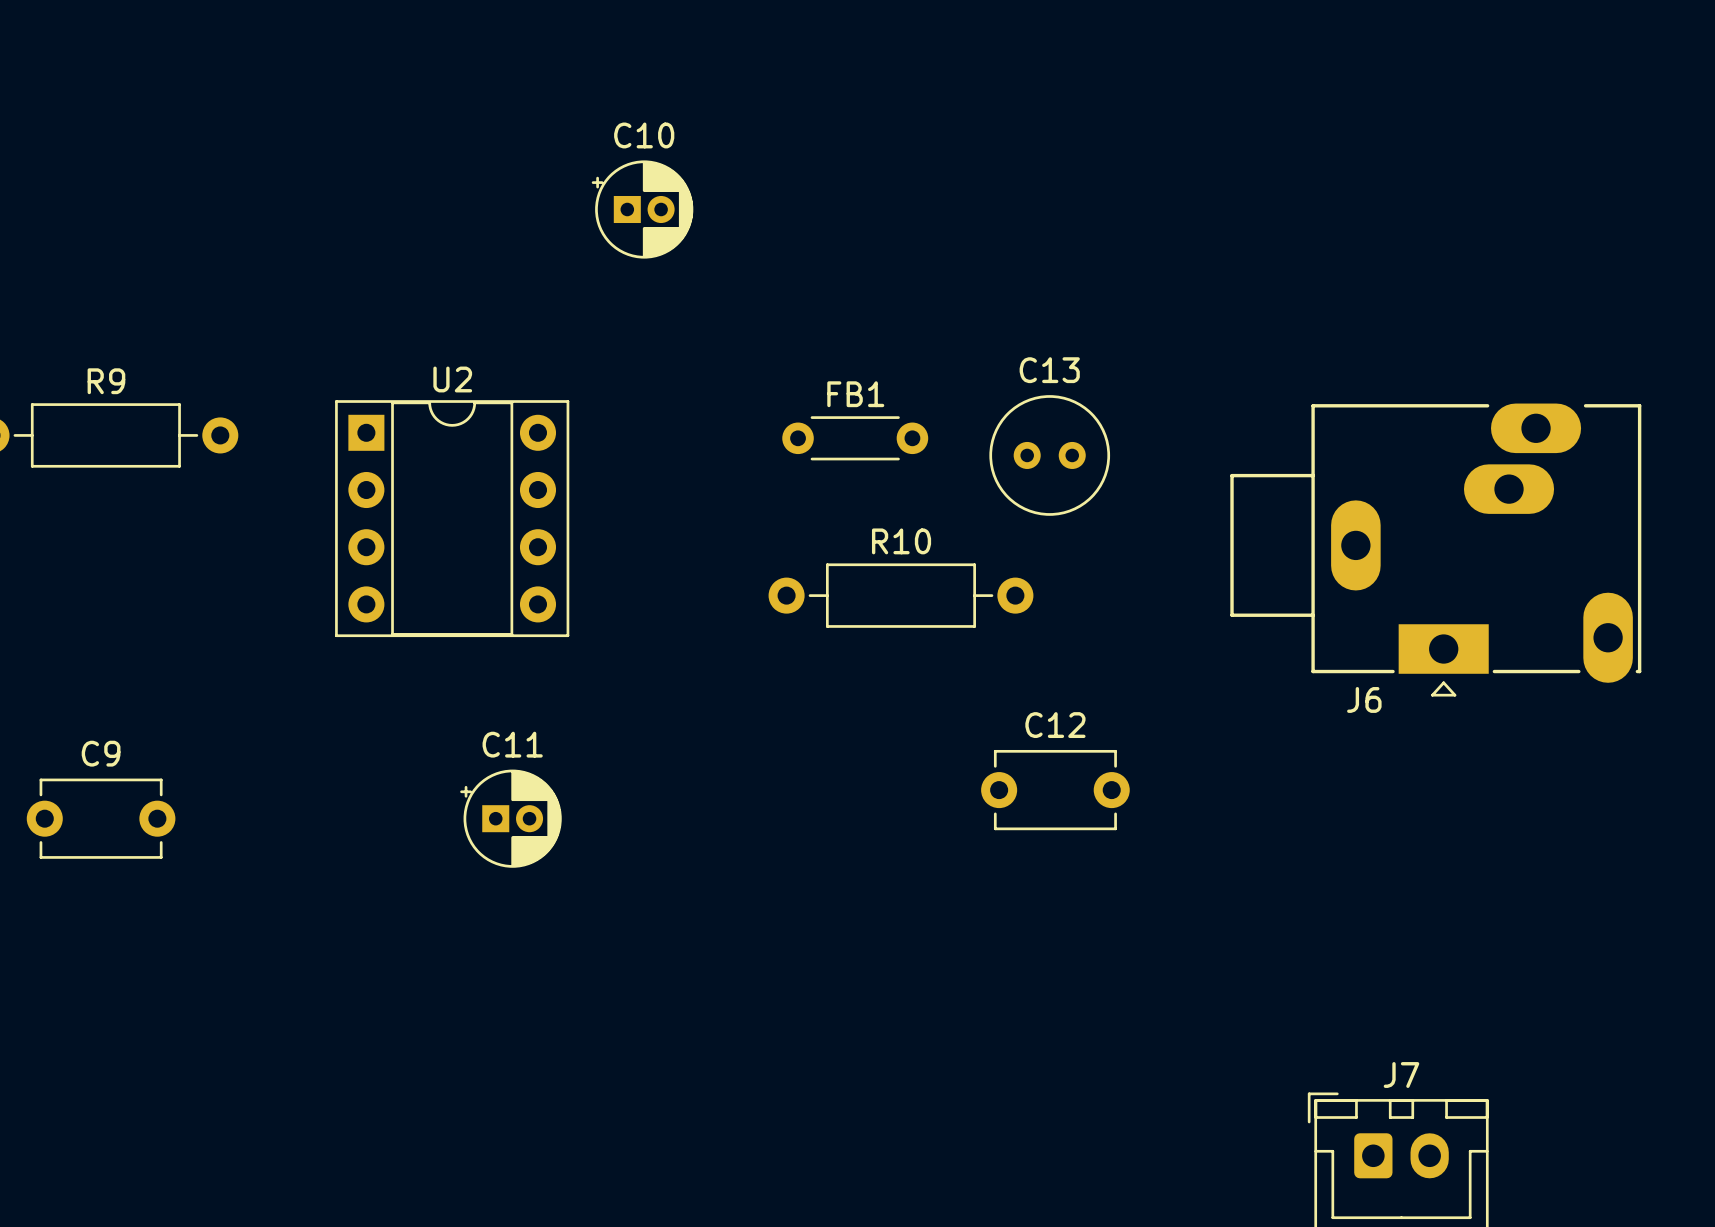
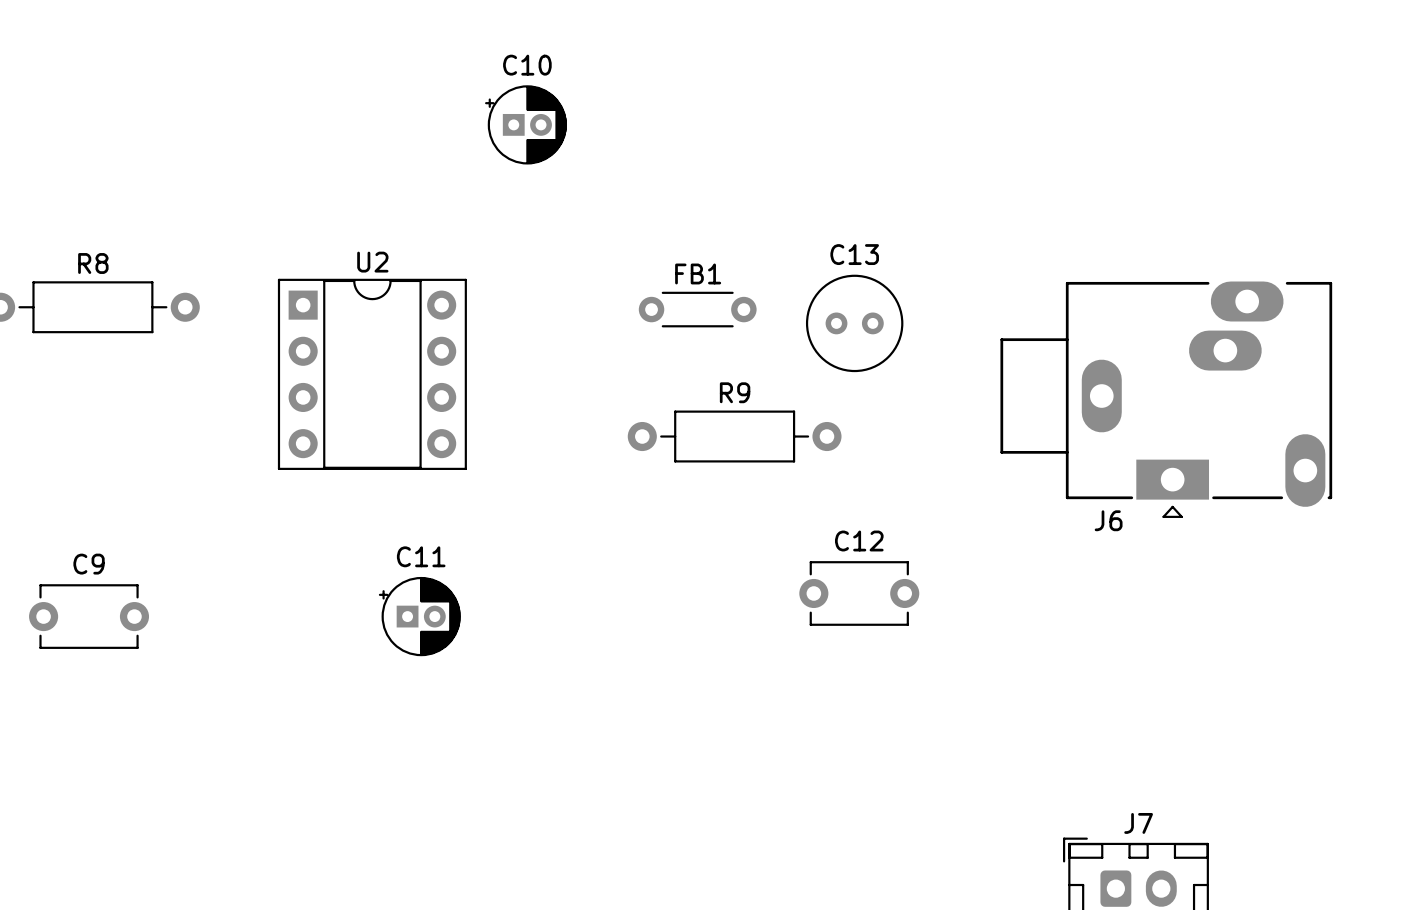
R9 name: R9 (106, 381) -> R8 (93, 263)
R10 name: R10 (901, 541) -> R9 (735, 392)

